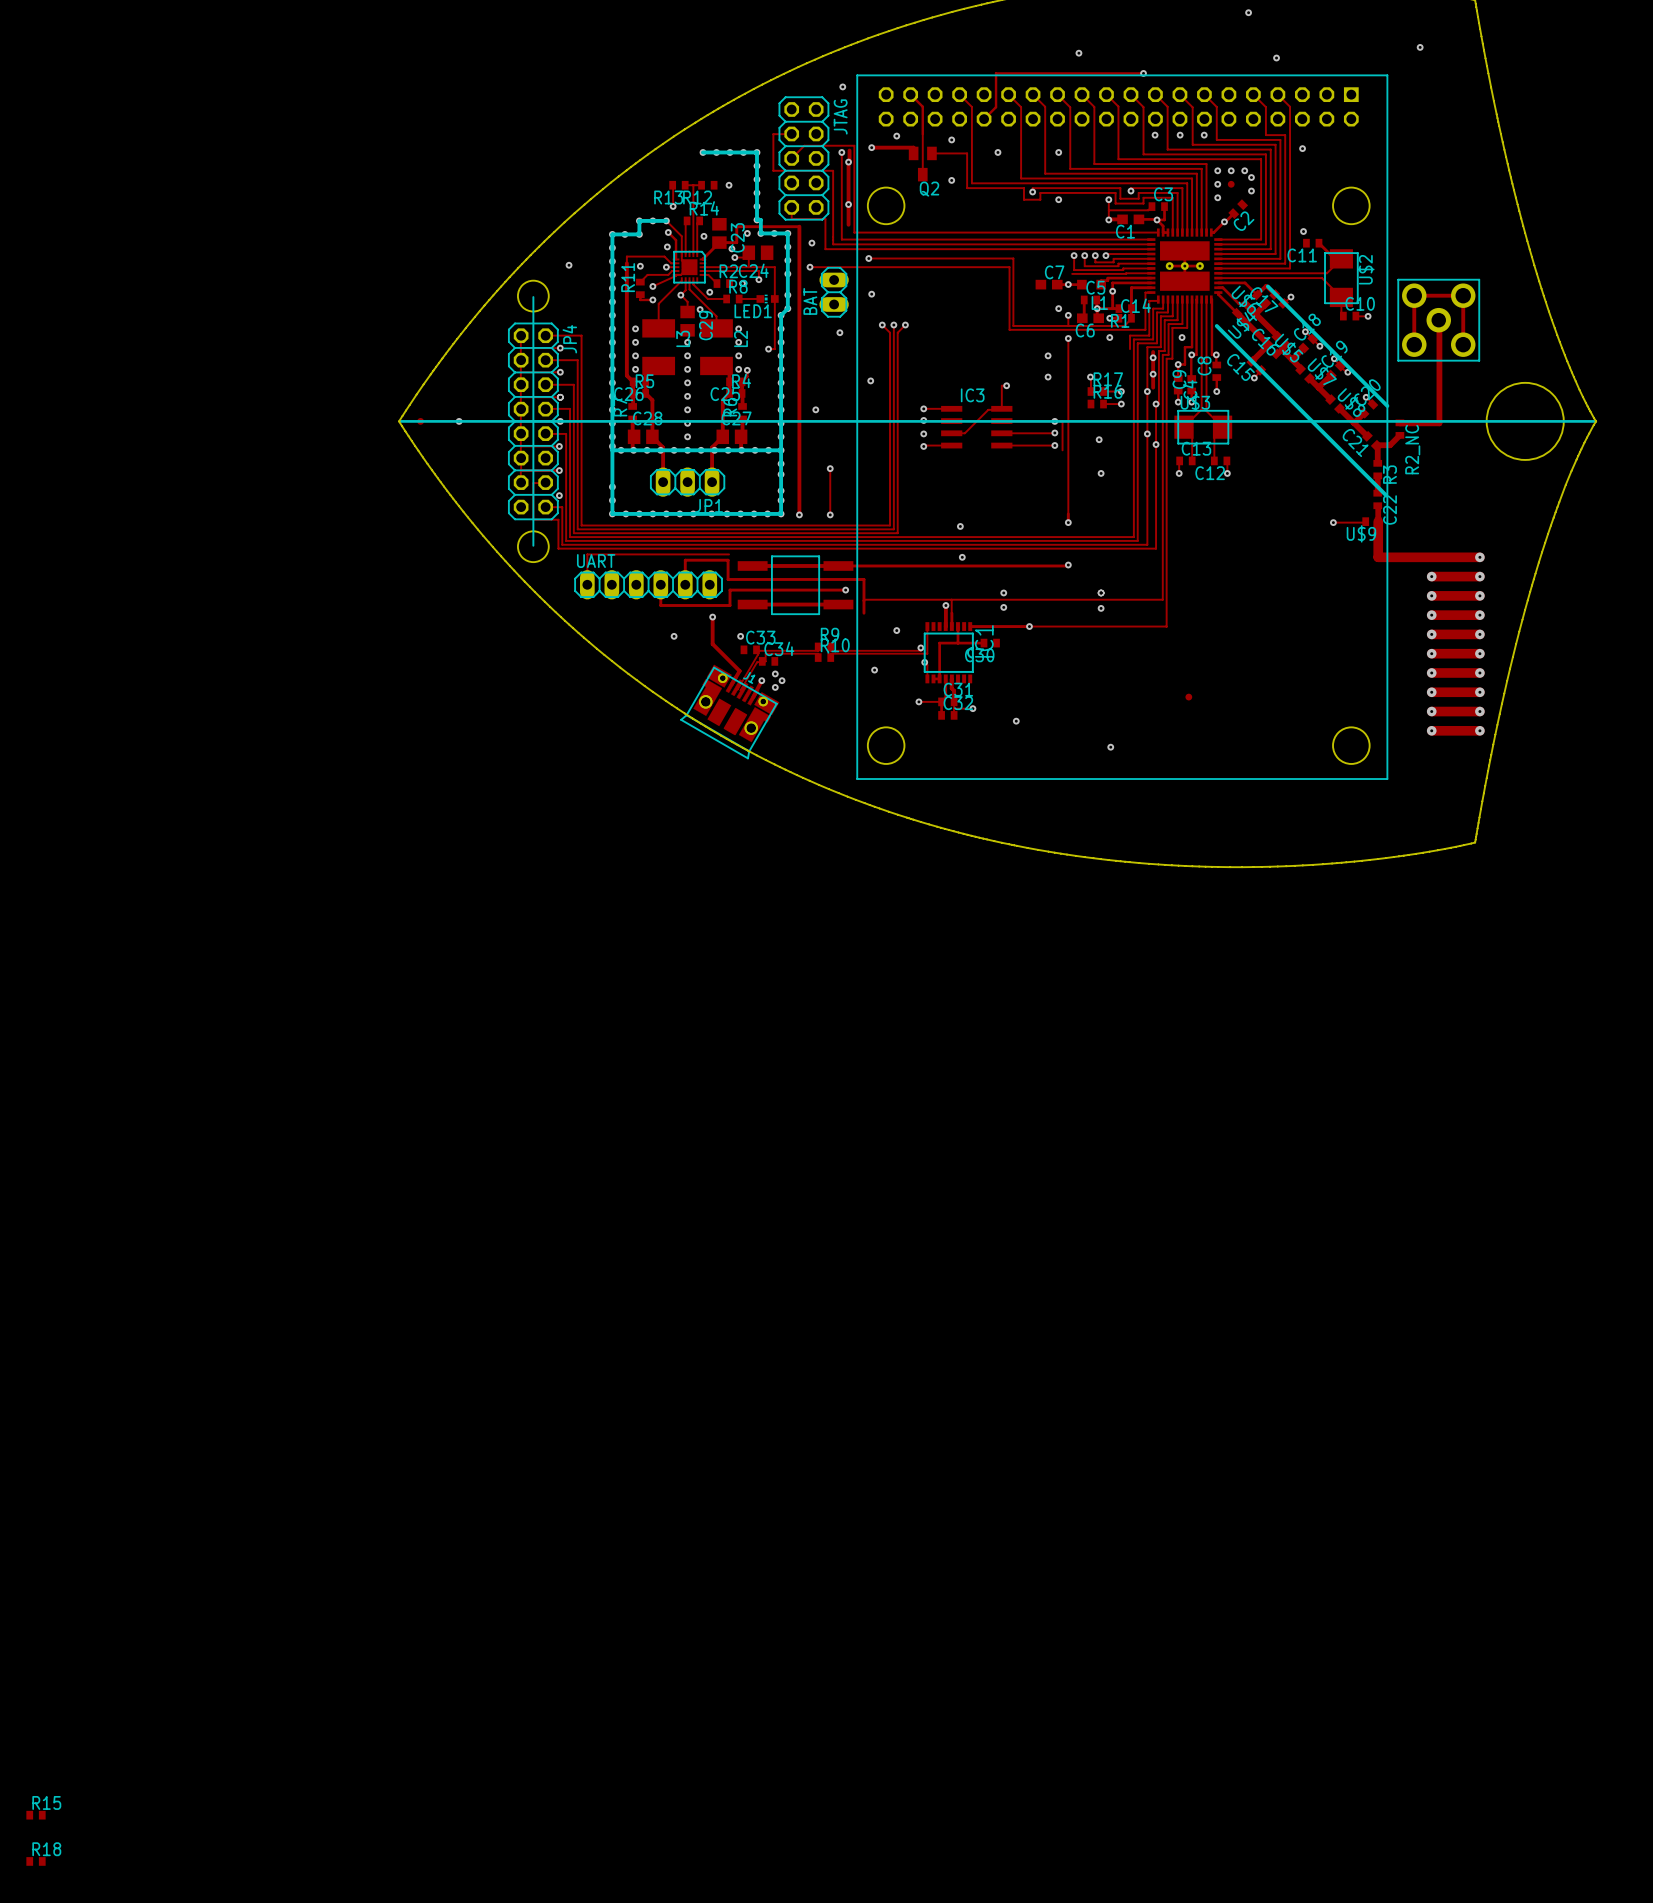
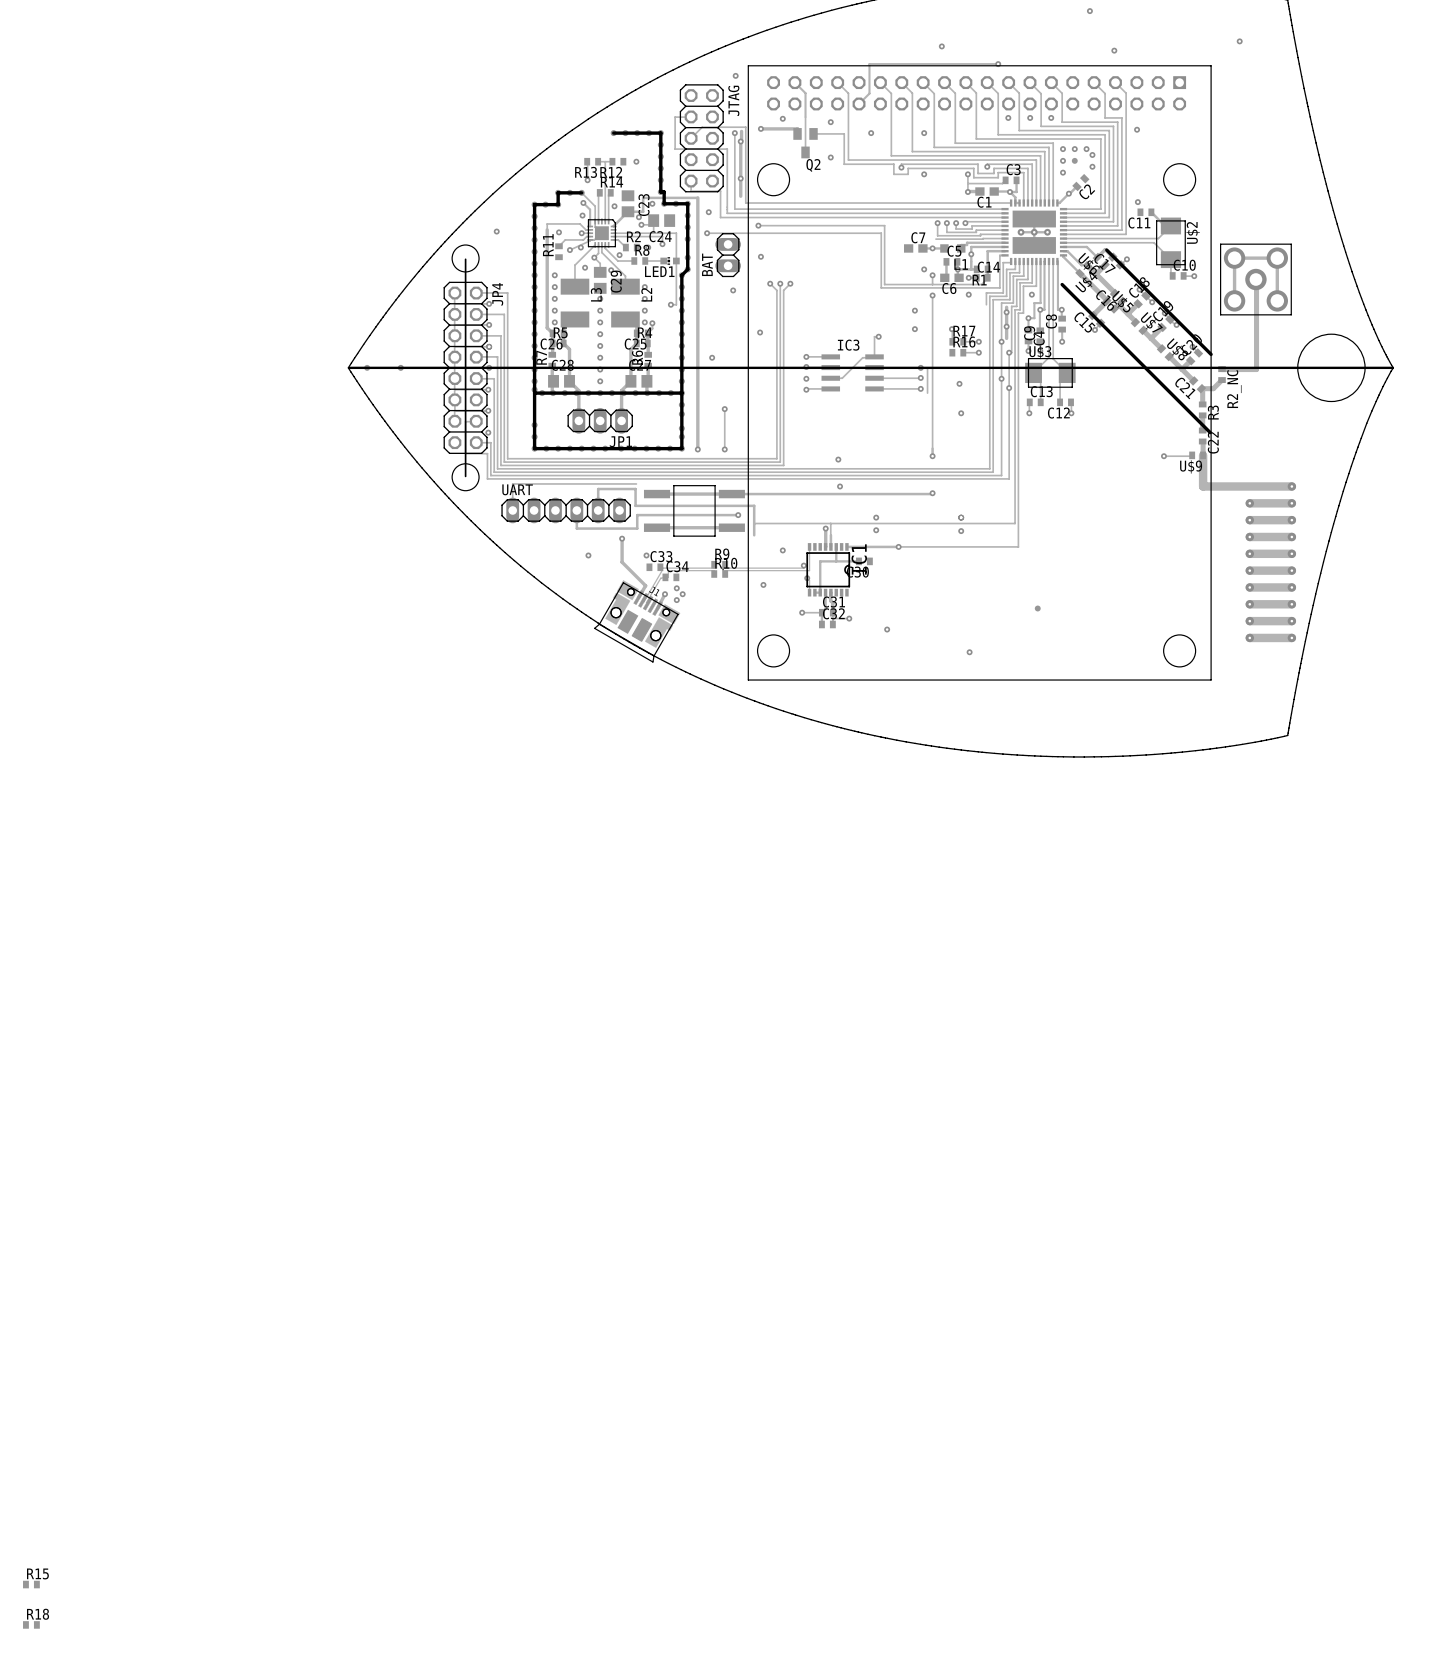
via: none -> (580, 247)
track: (640, 294) (640, 299) (652, 299) -> none
via: (652, 299) -> none
via: none -> (585, 267)
via: none -> (554, 275)

